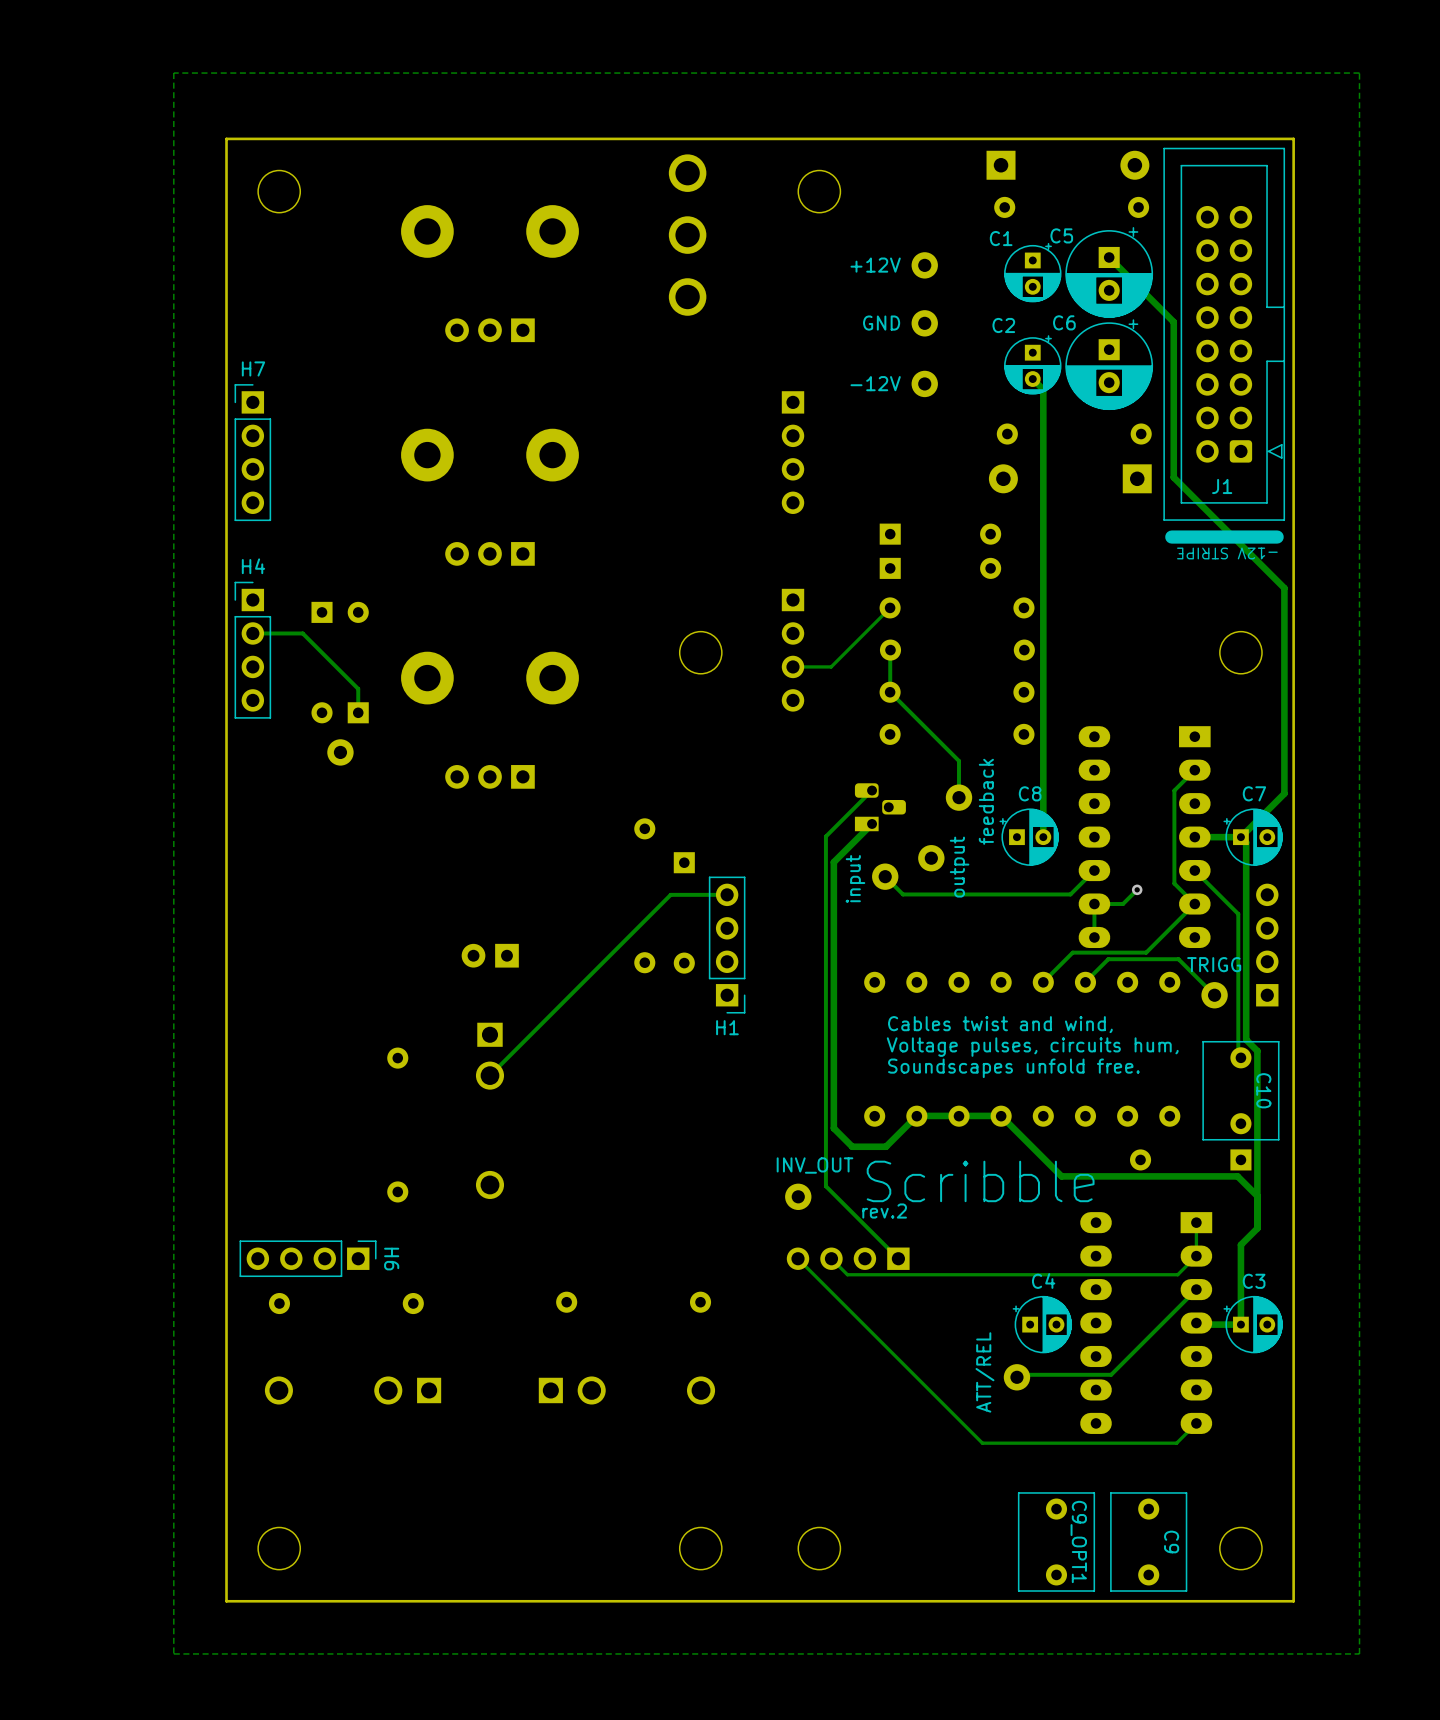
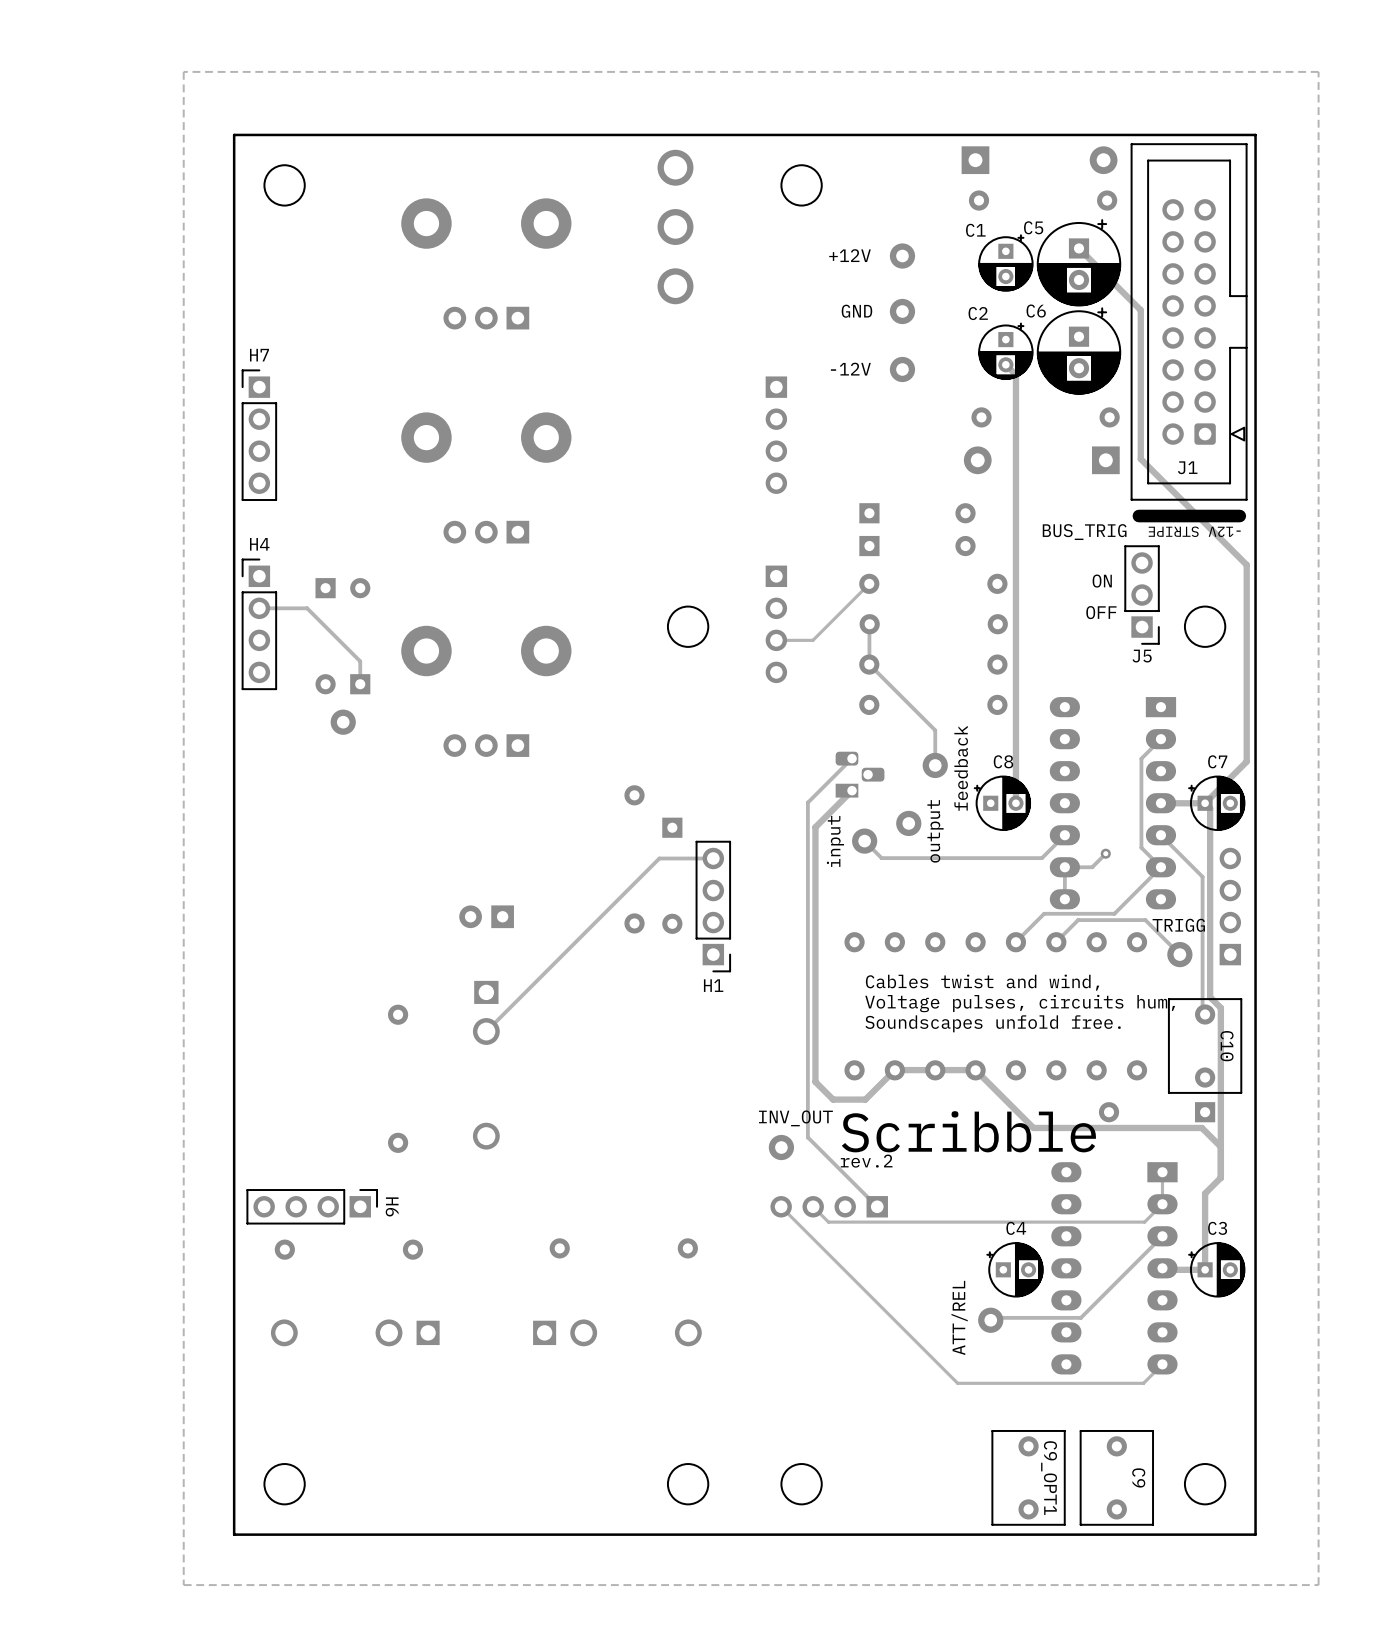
text: none -> BUS_TRIG (1084, 532)
text: none -> ON (1102, 581)
J5: none -> (1142, 595)
text: none -> OFF (1101, 612)

